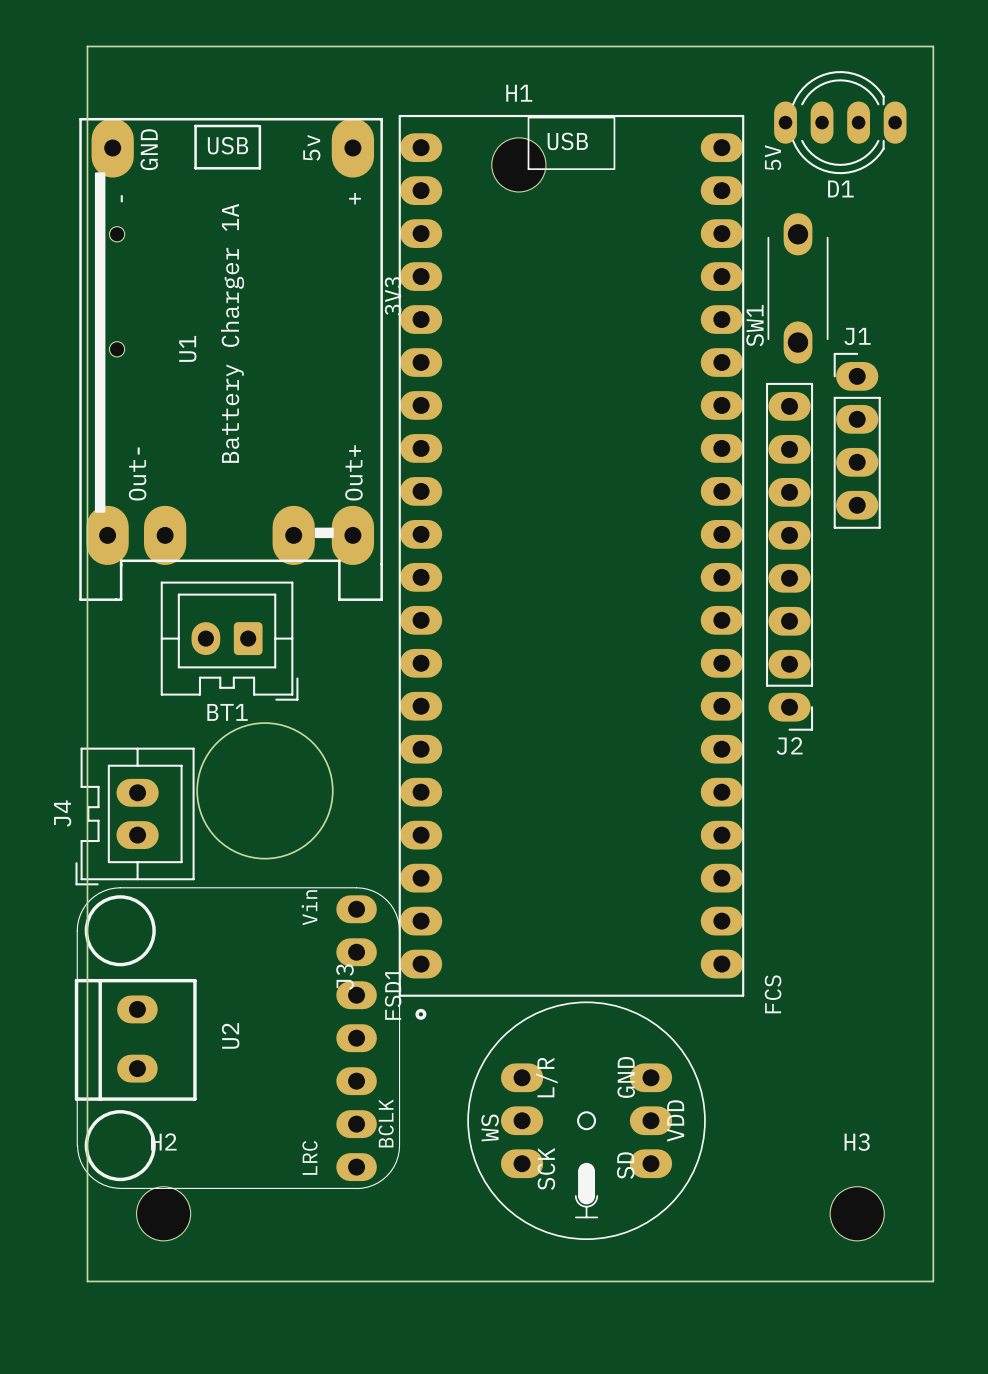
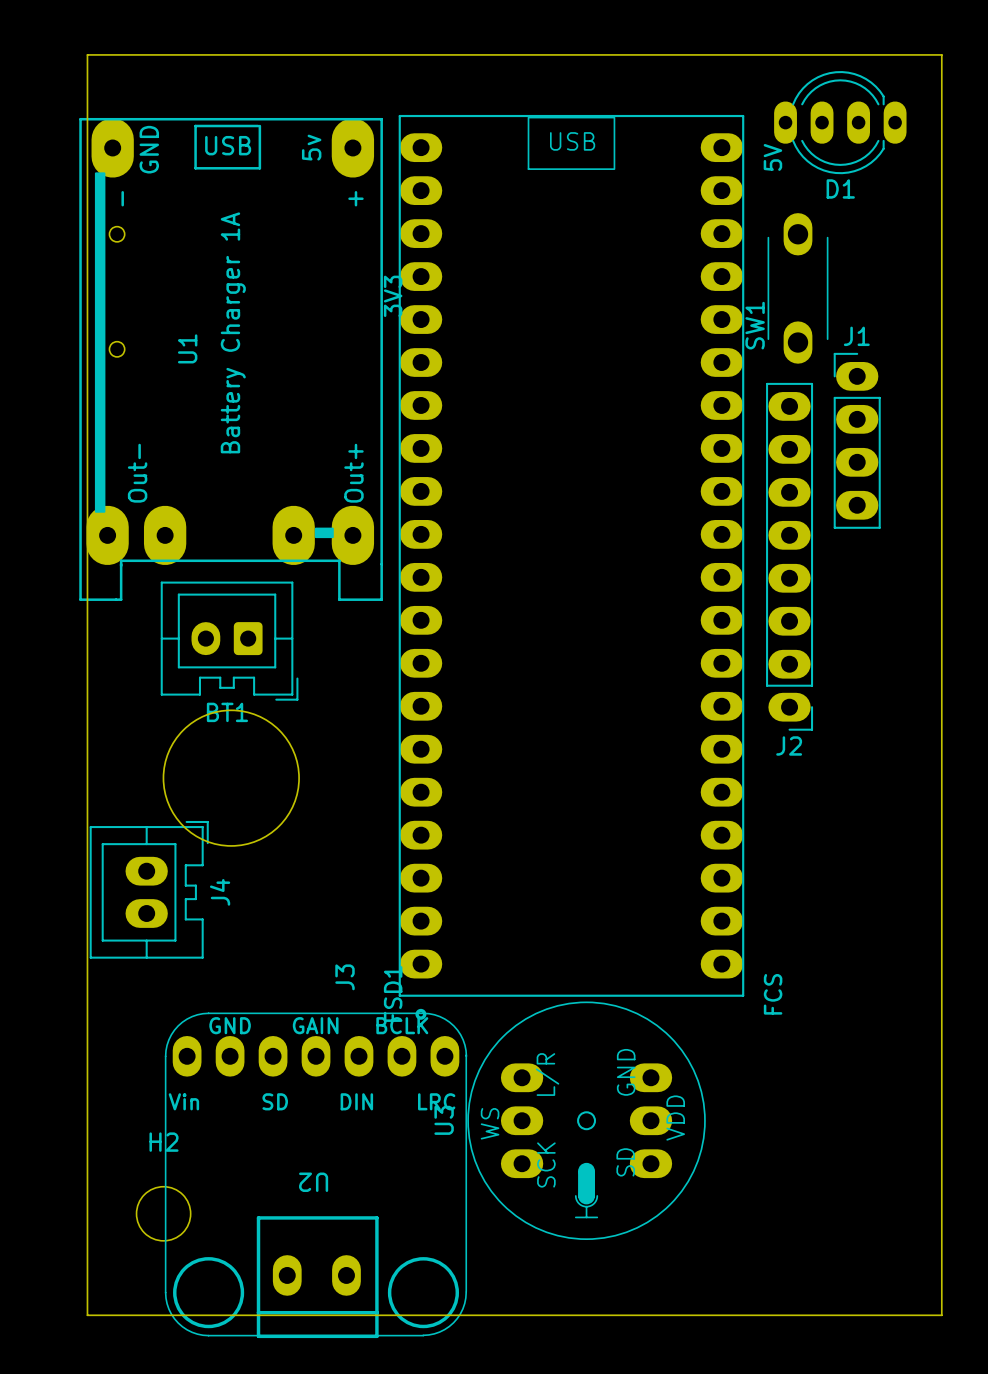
board edge: (87, 54) (87, 46) (933, 46) (933, 1281) (87, 1281) -> (87, 54) (941, 54) (941, 1315) (87, 1315) (87, 1281)
H1: (518, 164) -> none
J4 footprint: [75, 747, 195, 886] -> [89, 820, 209, 959]
round board edge position: (264, 790) -> (231, 778)
J4 name position: J4 (62, 813) -> J4 (220, 892)
U2 footprint: [74, 887, 400, 1190] -> [165, 1012, 467, 1339]
U3 name: none -> U3 (444, 1120)
H3: (857, 1213) -> none

